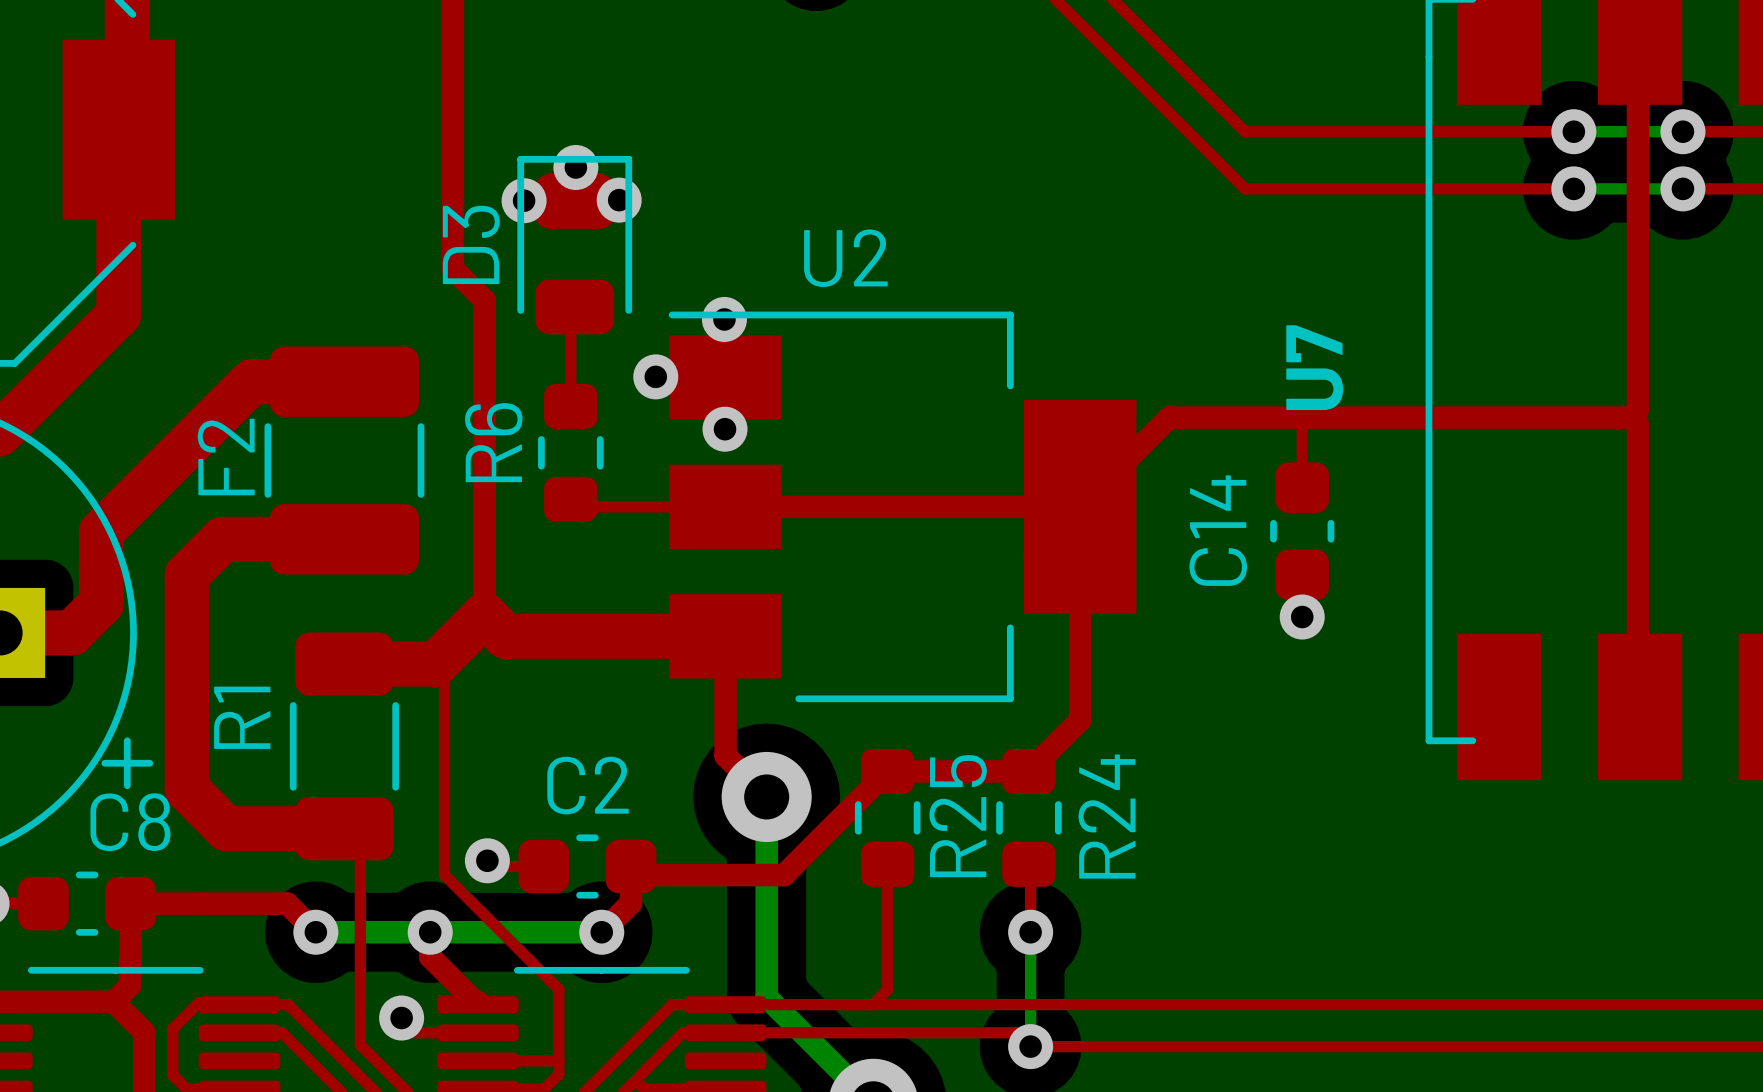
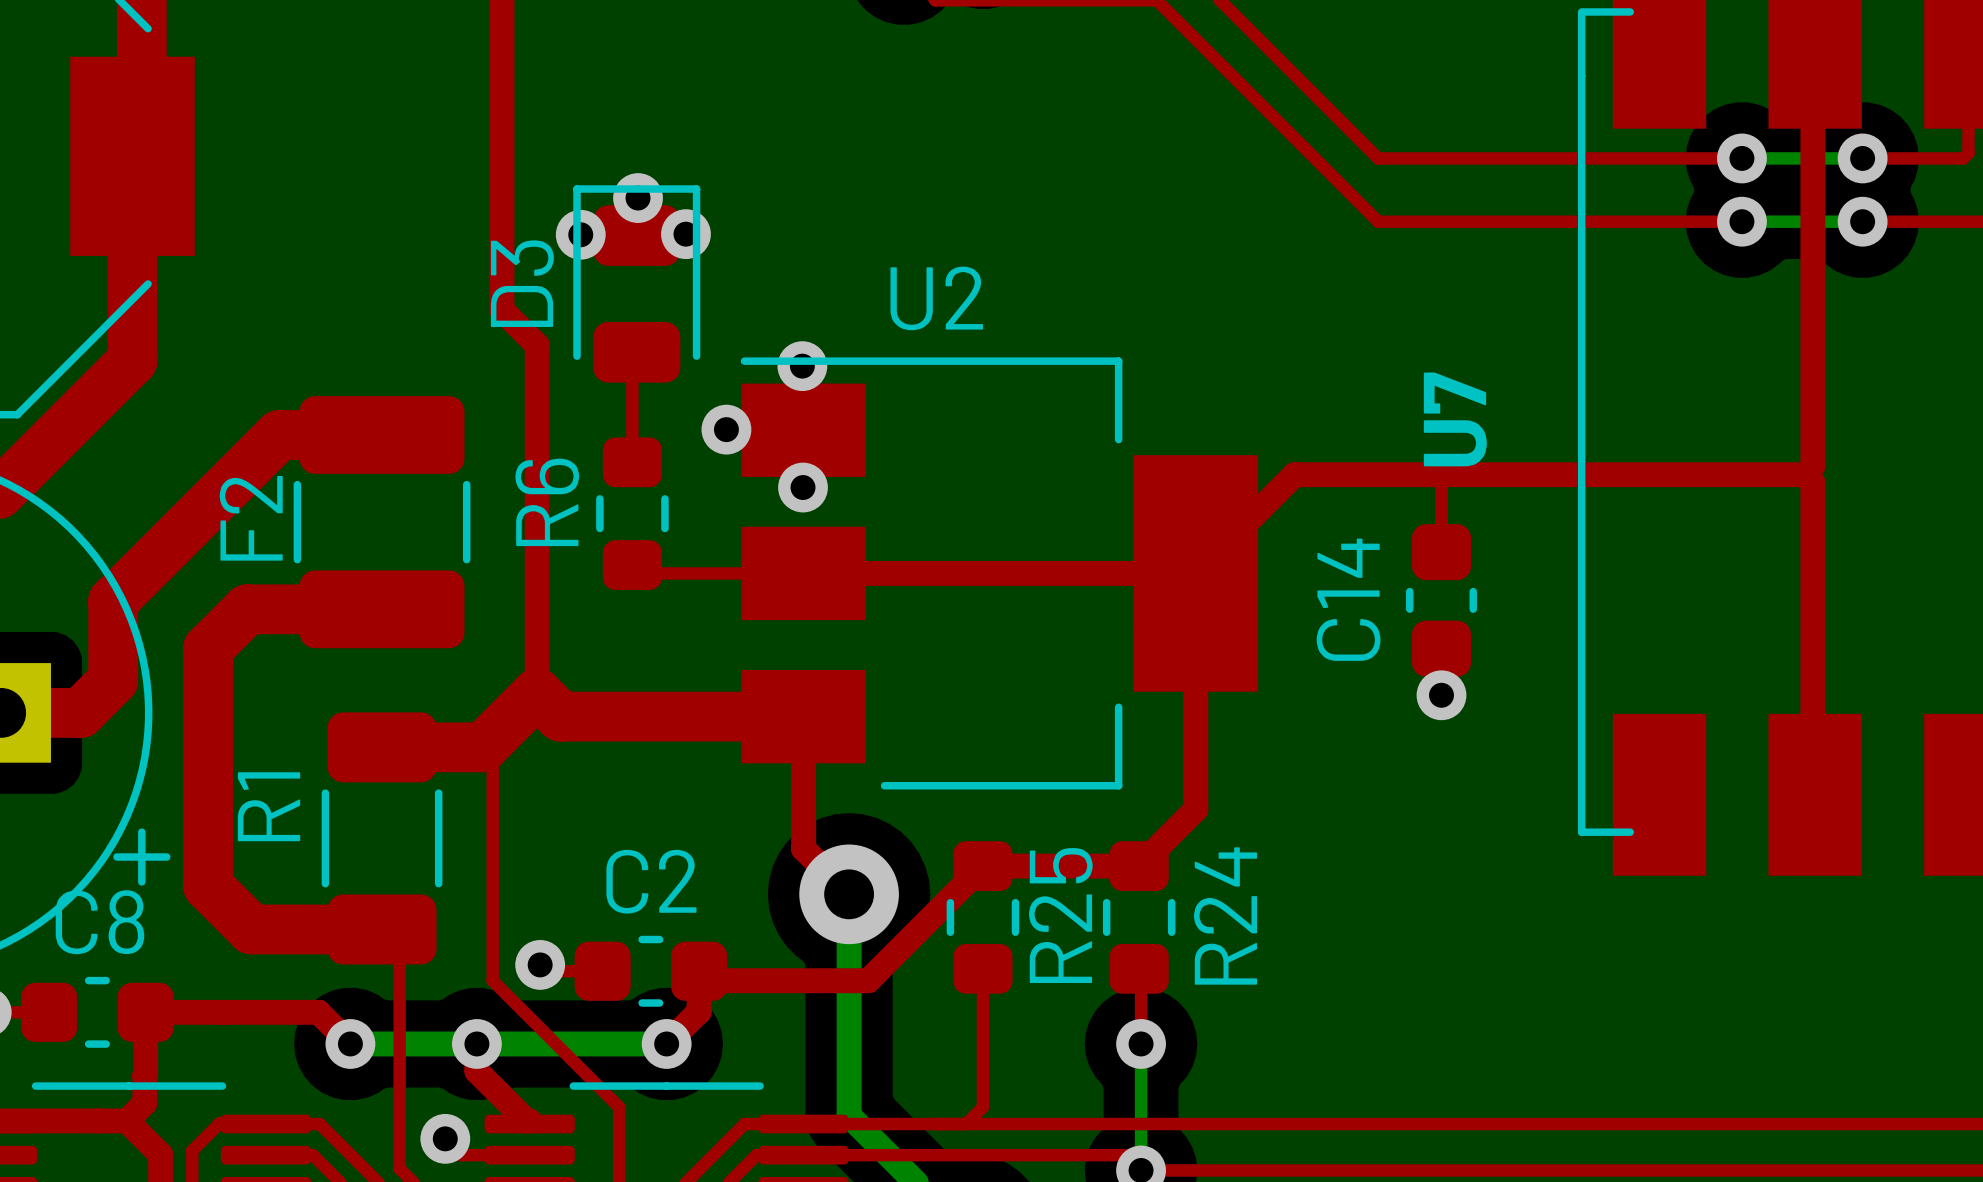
C8 name position: C8 (130, 822) -> C8 (100, 922)

